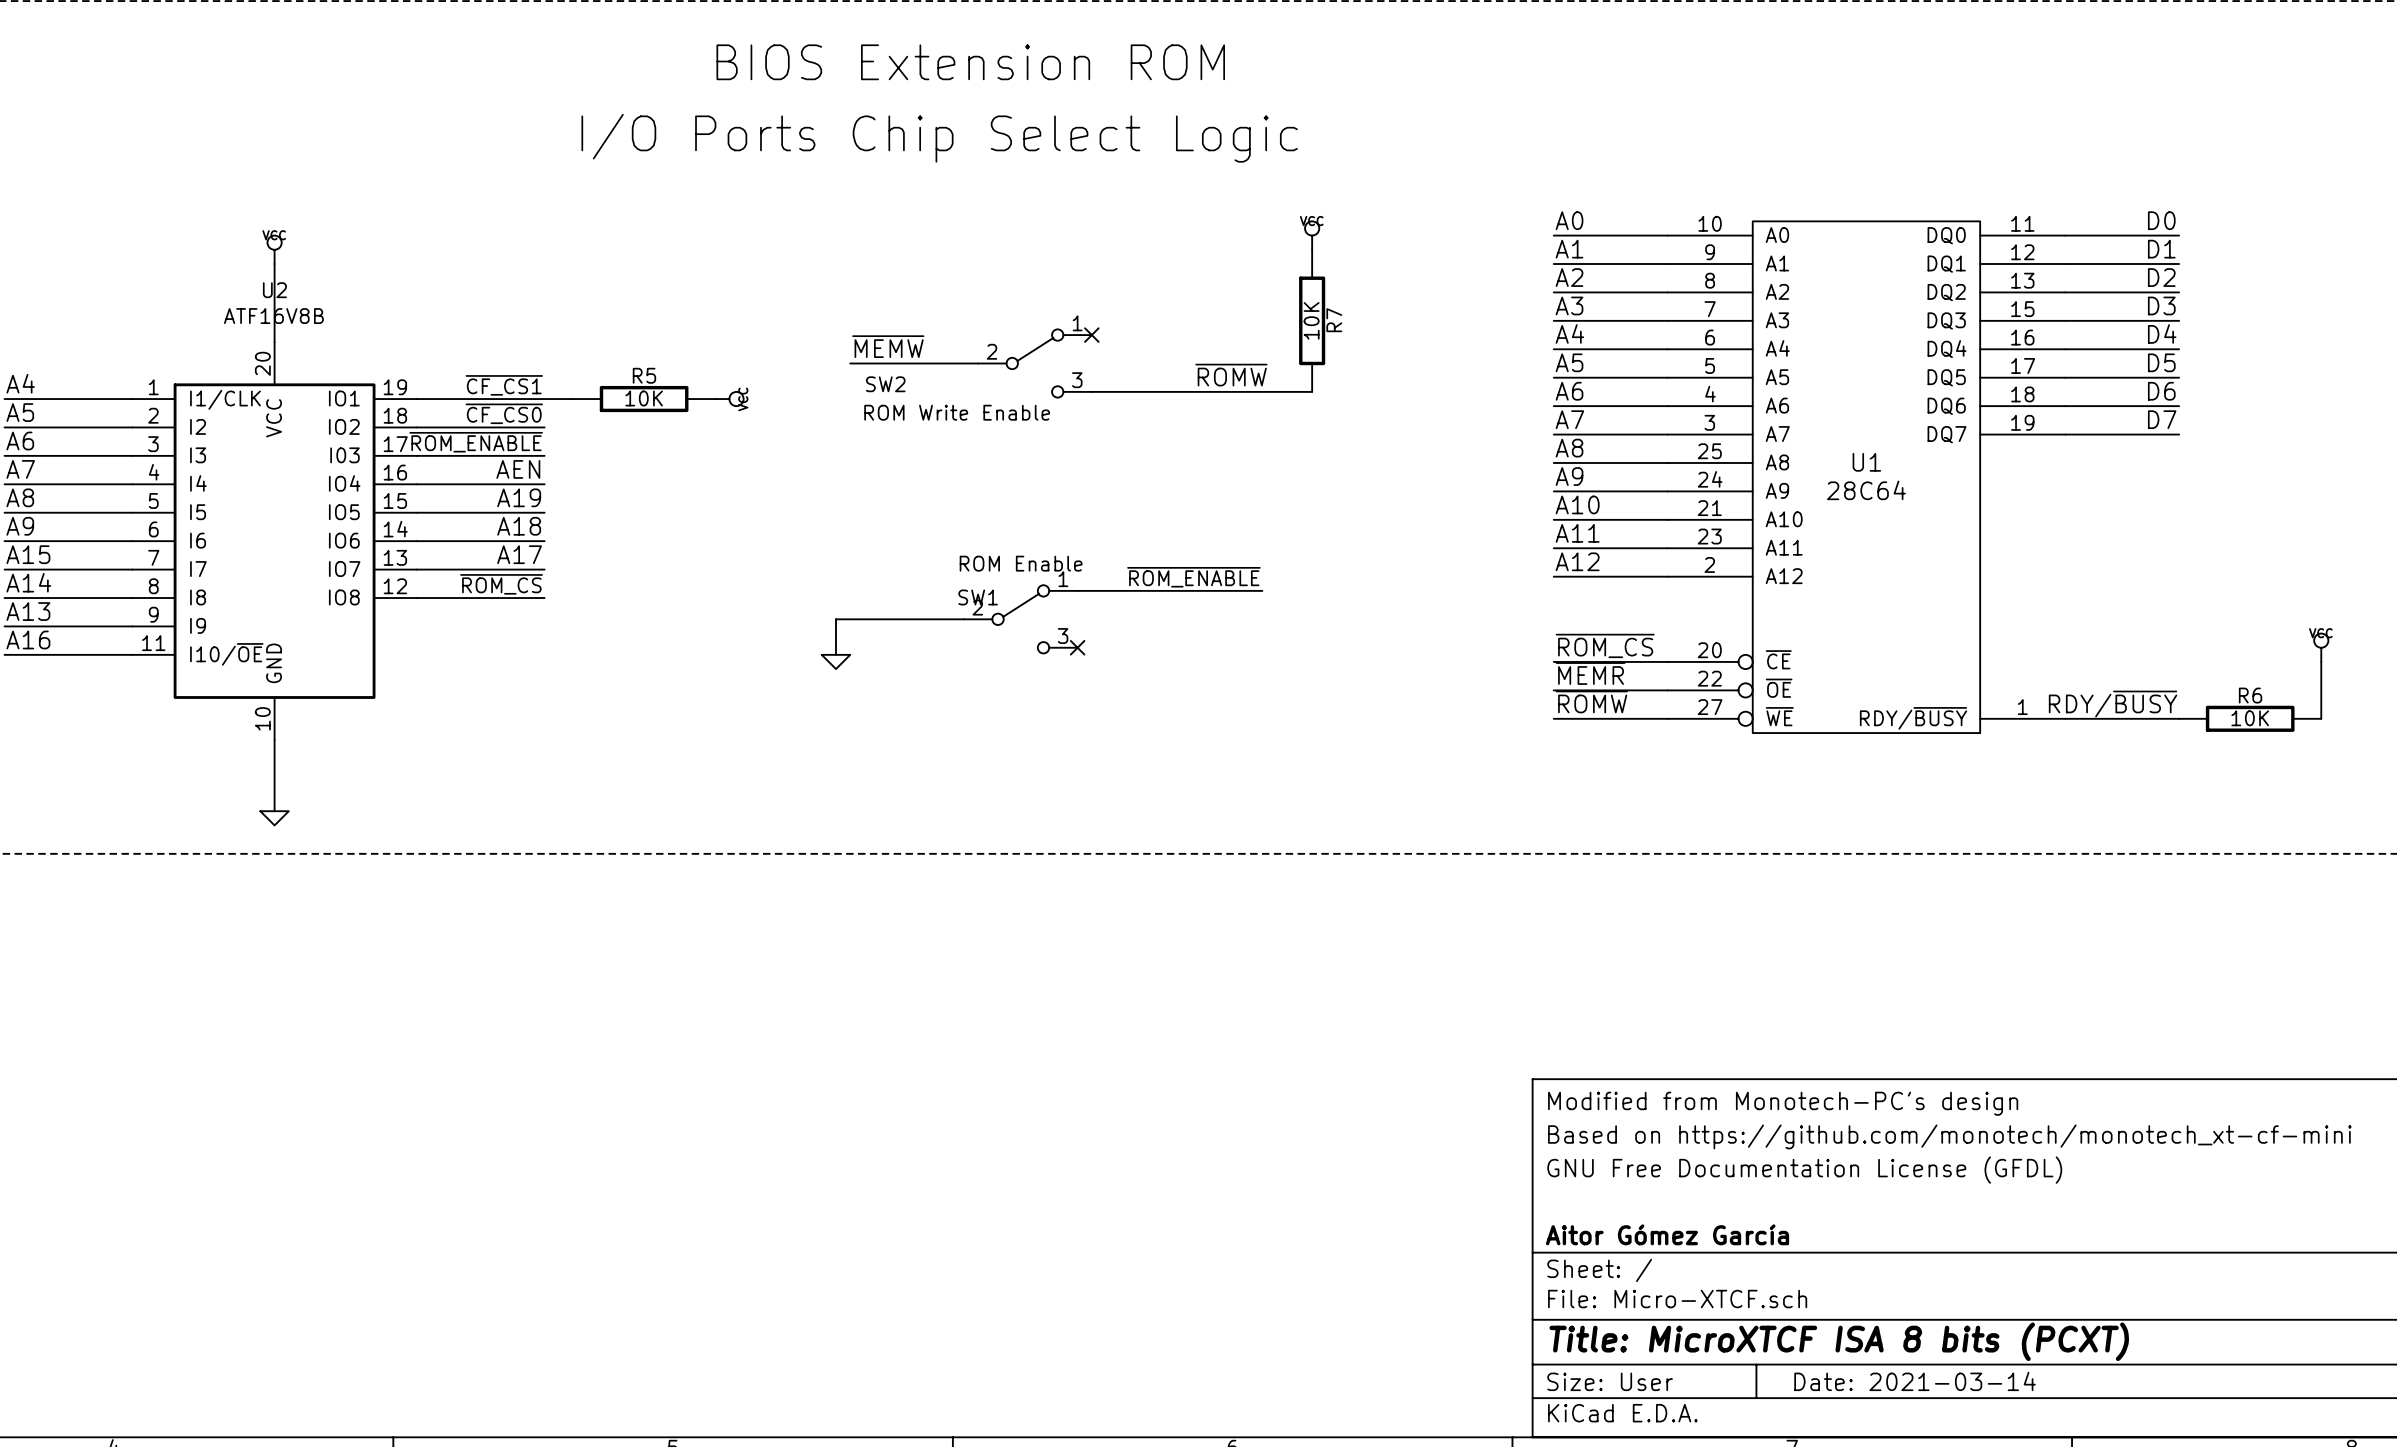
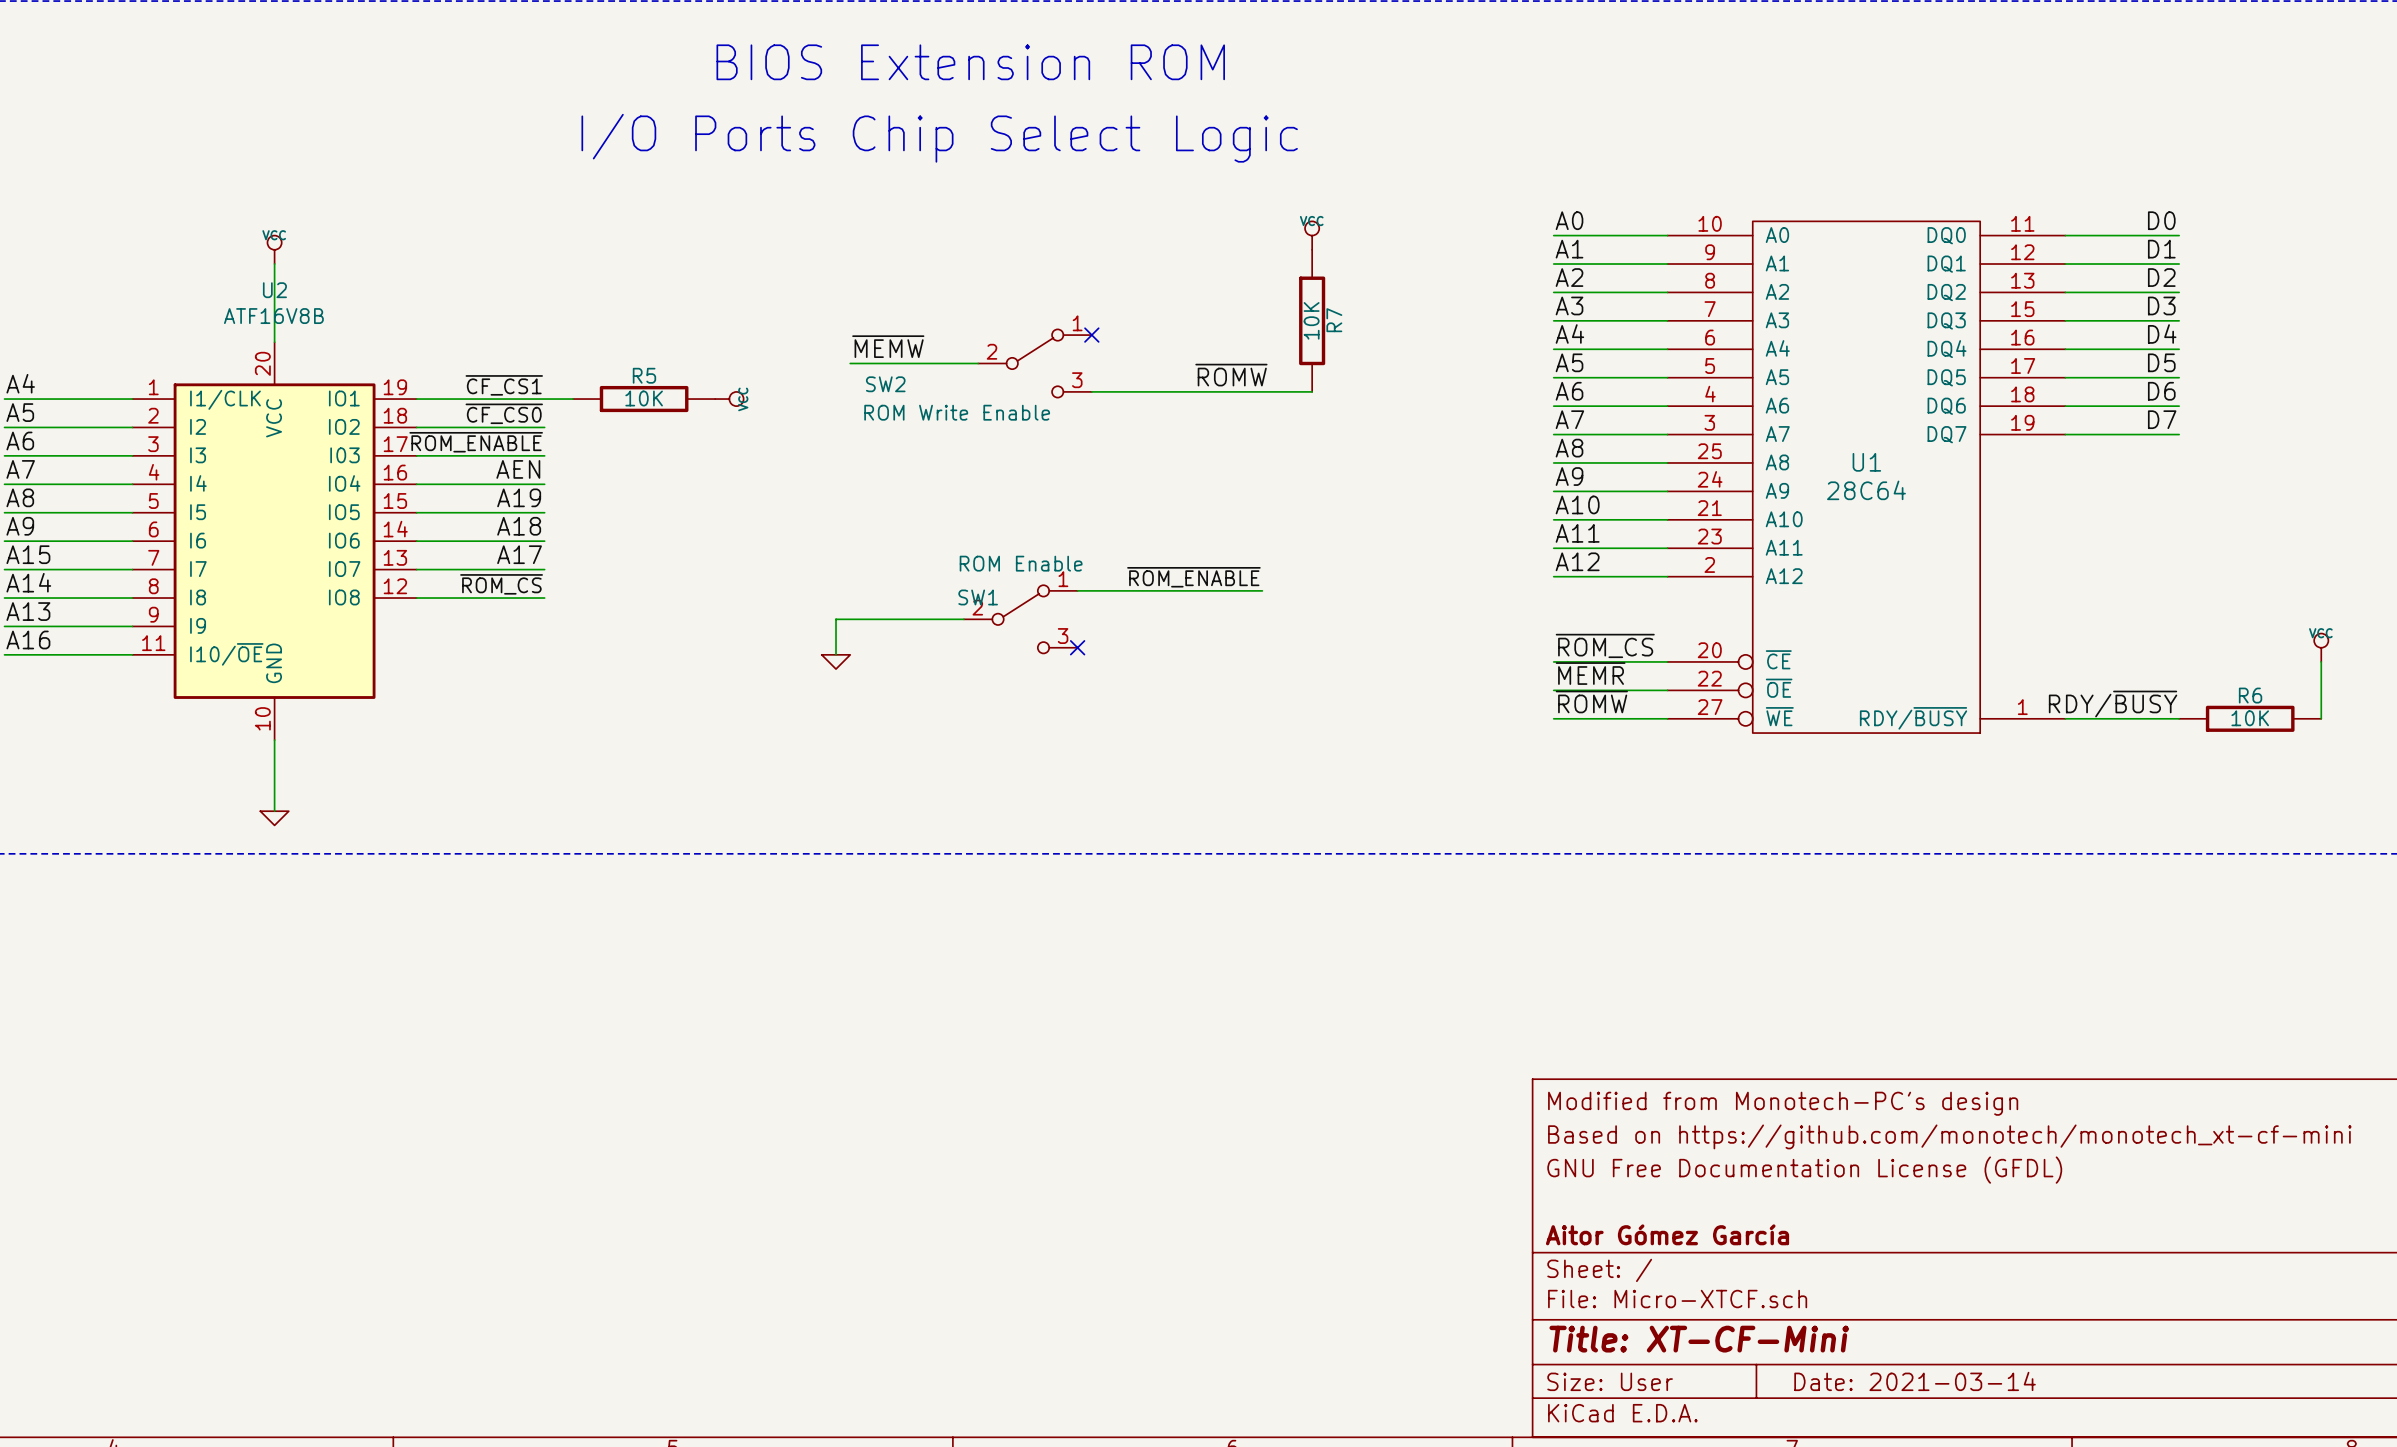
title block: Title: MicroXTCF ISA 8 bits (PCXT) (1839, 1341) -> Title: XT-CF-Mini (1699, 1339)

